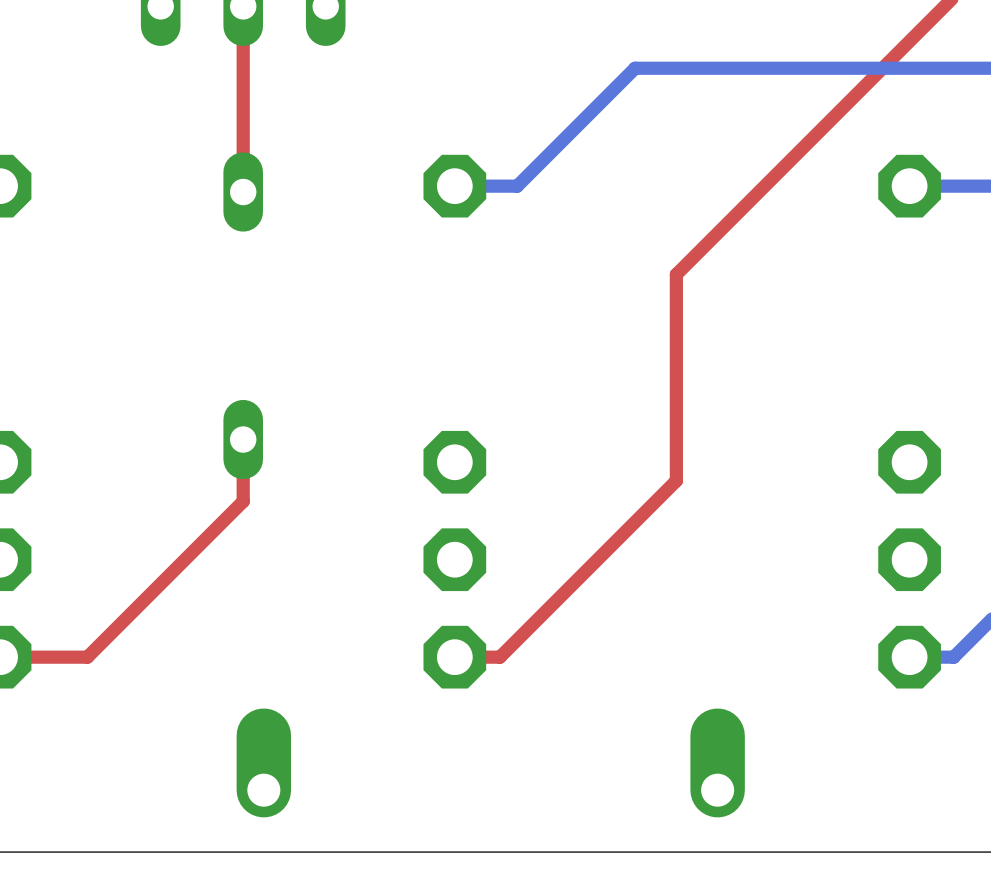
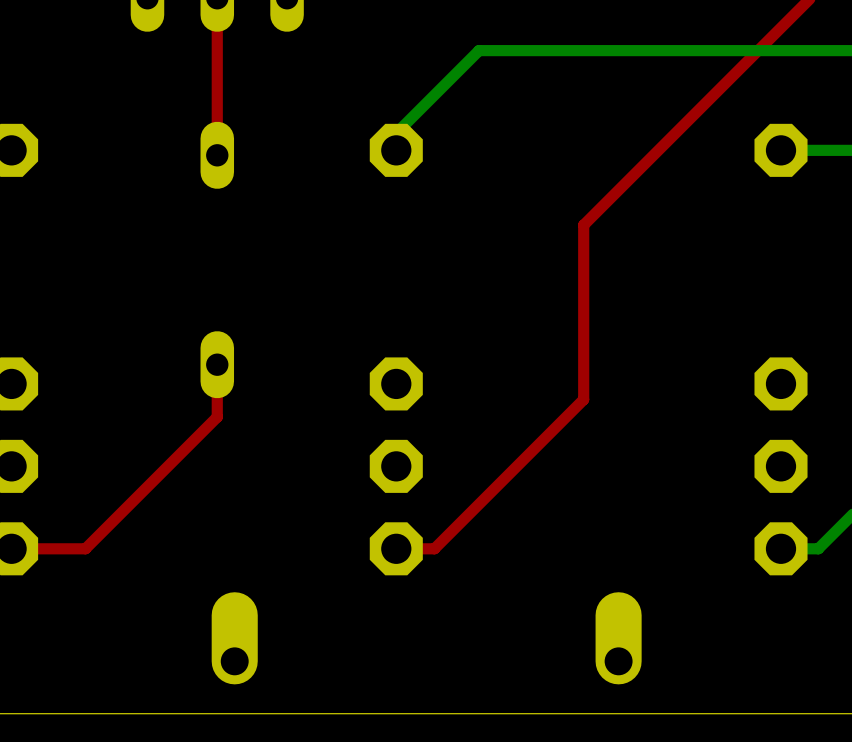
bottom track: (635, 68) (517, 186) (454, 186) -> (548, 50) (479, 50) (396, 132) (396, 150)

